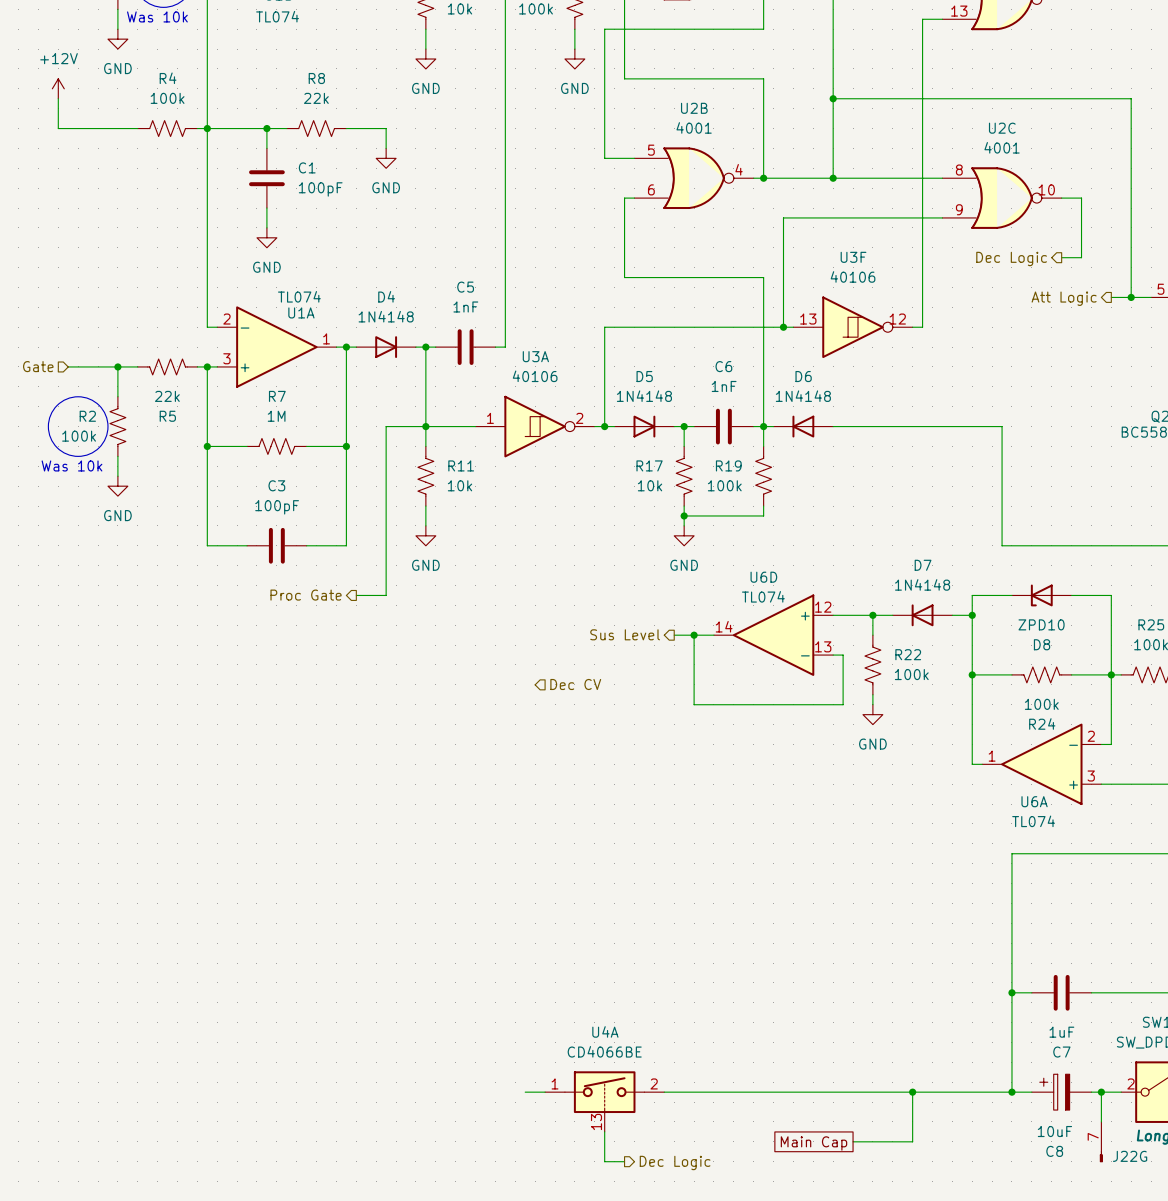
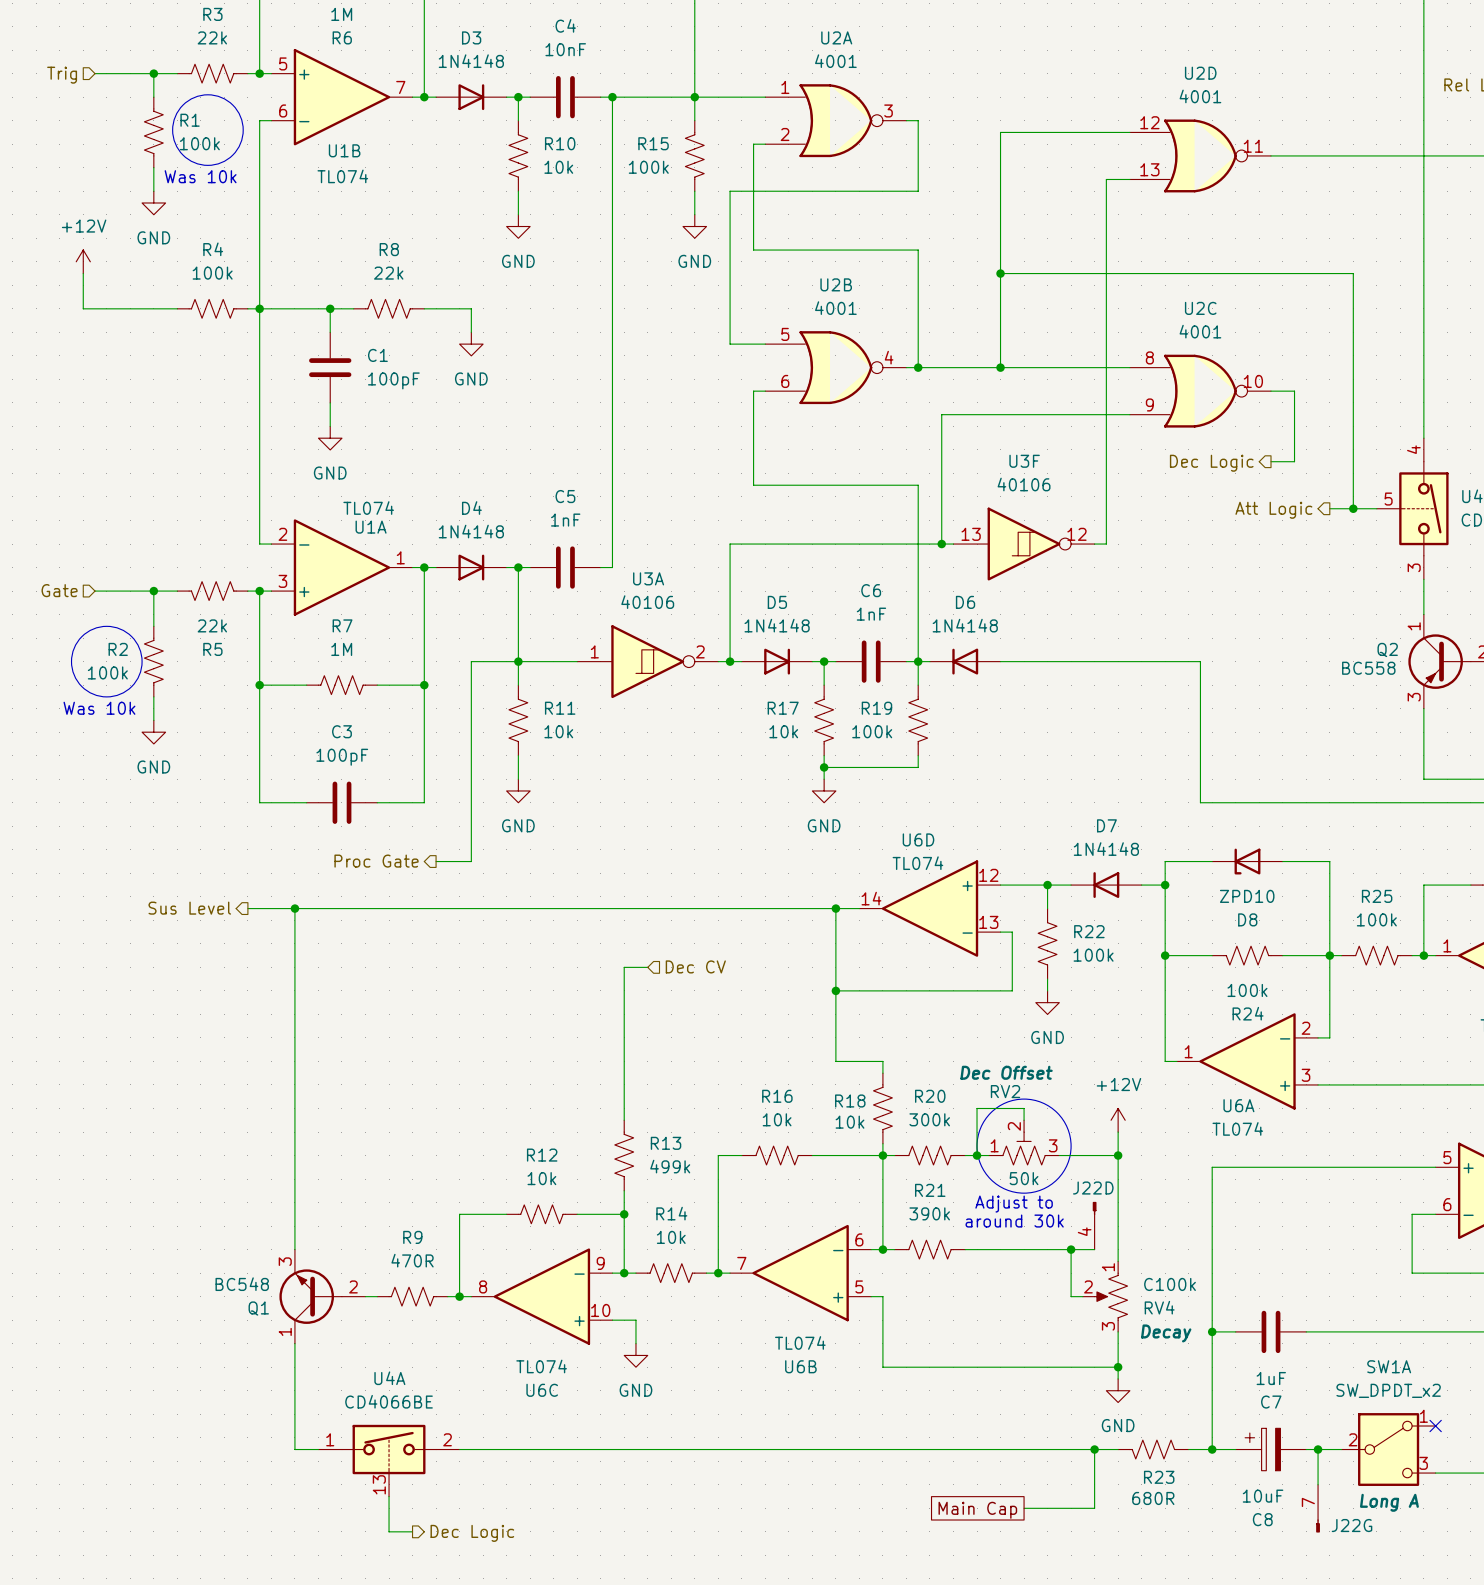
hierarchical label: none -> Sus Level (189, 908)
hierarchical label: Sus Level (625, 634) -> none
wire: none -> (247, 908) (812, 908)
wire: none -> (294, 908) (294, 1249)
junction: none -> (294, 908)
wire: none -> (647, 967) (624, 967) (624, 1120)
wire: none -> (835, 990) (835, 1061) (882, 1061) (882, 1073)
junction: none -> (835, 990)
drawing: none -> [977, 1099, 1072, 1194]
R18: none -> 10k (882, 1108)
wire: none -> (1024, 1120) (1024, 1108) (977, 1108) (977, 1155)
power symbol: none -> +12V (1118, 1120)
wire: none -> (1118, 1132) (1118, 1261)
RV2: none -> 50k (1024, 1142)
wire: none -> (882, 1143) (882, 1249)
R13: none -> 499k (624, 1155)
wire: none -> (741, 1155) (718, 1155) (718, 1273)
R16: none -> 10k (777, 1155)
wire: none -> (812, 1155) (894, 1155)
junction: none -> (882, 1155)
R20: none -> 300k (929, 1155)
wire: none -> (965, 1155) (988, 1155)
junction: none -> (977, 1155)
wire: none -> (1059, 1155) (1118, 1155)
junction: none -> (1118, 1155)
wire: none -> (624, 1190) (624, 1273)
text: none -> Adjust to (1014, 1204)
wire: none -> (506, 1214) (459, 1214) (459, 1296)
R12: none -> 10k (541, 1214)
wire: none -> (577, 1214) (624, 1214)
junction: none -> (624, 1214)
text: none -> around 30k (1014, 1221)
J22D: none -> (1094, 1225)
wire: none -> (871, 1249) (894, 1249)
junction: none -> (882, 1249)
R21: none -> 390k (929, 1249)
wire: none -> (965, 1249) (1094, 1249)
wire: none -> (1071, 1249) (1071, 1296) (1082, 1296)
junction: none -> (1071, 1249)
wire: none -> (612, 1273) (635, 1273)
junction: none -> (624, 1273)
R14: none -> 10k (671, 1273)
wire: none -> (706, 1273) (730, 1273)
junction: none -> (718, 1273)
U6B: none -> TL074 (800, 1273)
Q1: none -> BC548 (322, 1296)
wire: none -> (365, 1296) (377, 1296)
R9: none -> 470R (412, 1296)
wire: none -> (447, 1296) (471, 1296)
junction: none -> (459, 1296)
U6C: none -> TL074 (541, 1296)
wire: none -> (871, 1296) (882, 1296) (882, 1367) (1118, 1367)
RV4: none -> C100k (1105, 1296)
wire: none -> (612, 1320) (635, 1320) (635, 1343)
wire: none -> (1118, 1331) (1118, 1378)
wire: none -> (294, 1343) (294, 1449) (318, 1449)
power symbol: none -> GND (635, 1355)
junction: none -> (1118, 1367)
power symbol: none -> GND (1118, 1390)
wire: none -> (459, 1449) (635, 1449)
wire: (932, 1092) (992, 1092) -> none
R23: none -> 680R (1153, 1449)
U4A position: (604, 1101) -> (389, 1460)
wire: none -> (389, 1496) (389, 1531) (412, 1531)
wire: (604, 1131) (604, 1161) (624, 1161) -> none
hierarchical label: none -> Dec Logic (472, 1533)
hierarchical label: Dec Logic (675, 1162) -> none

